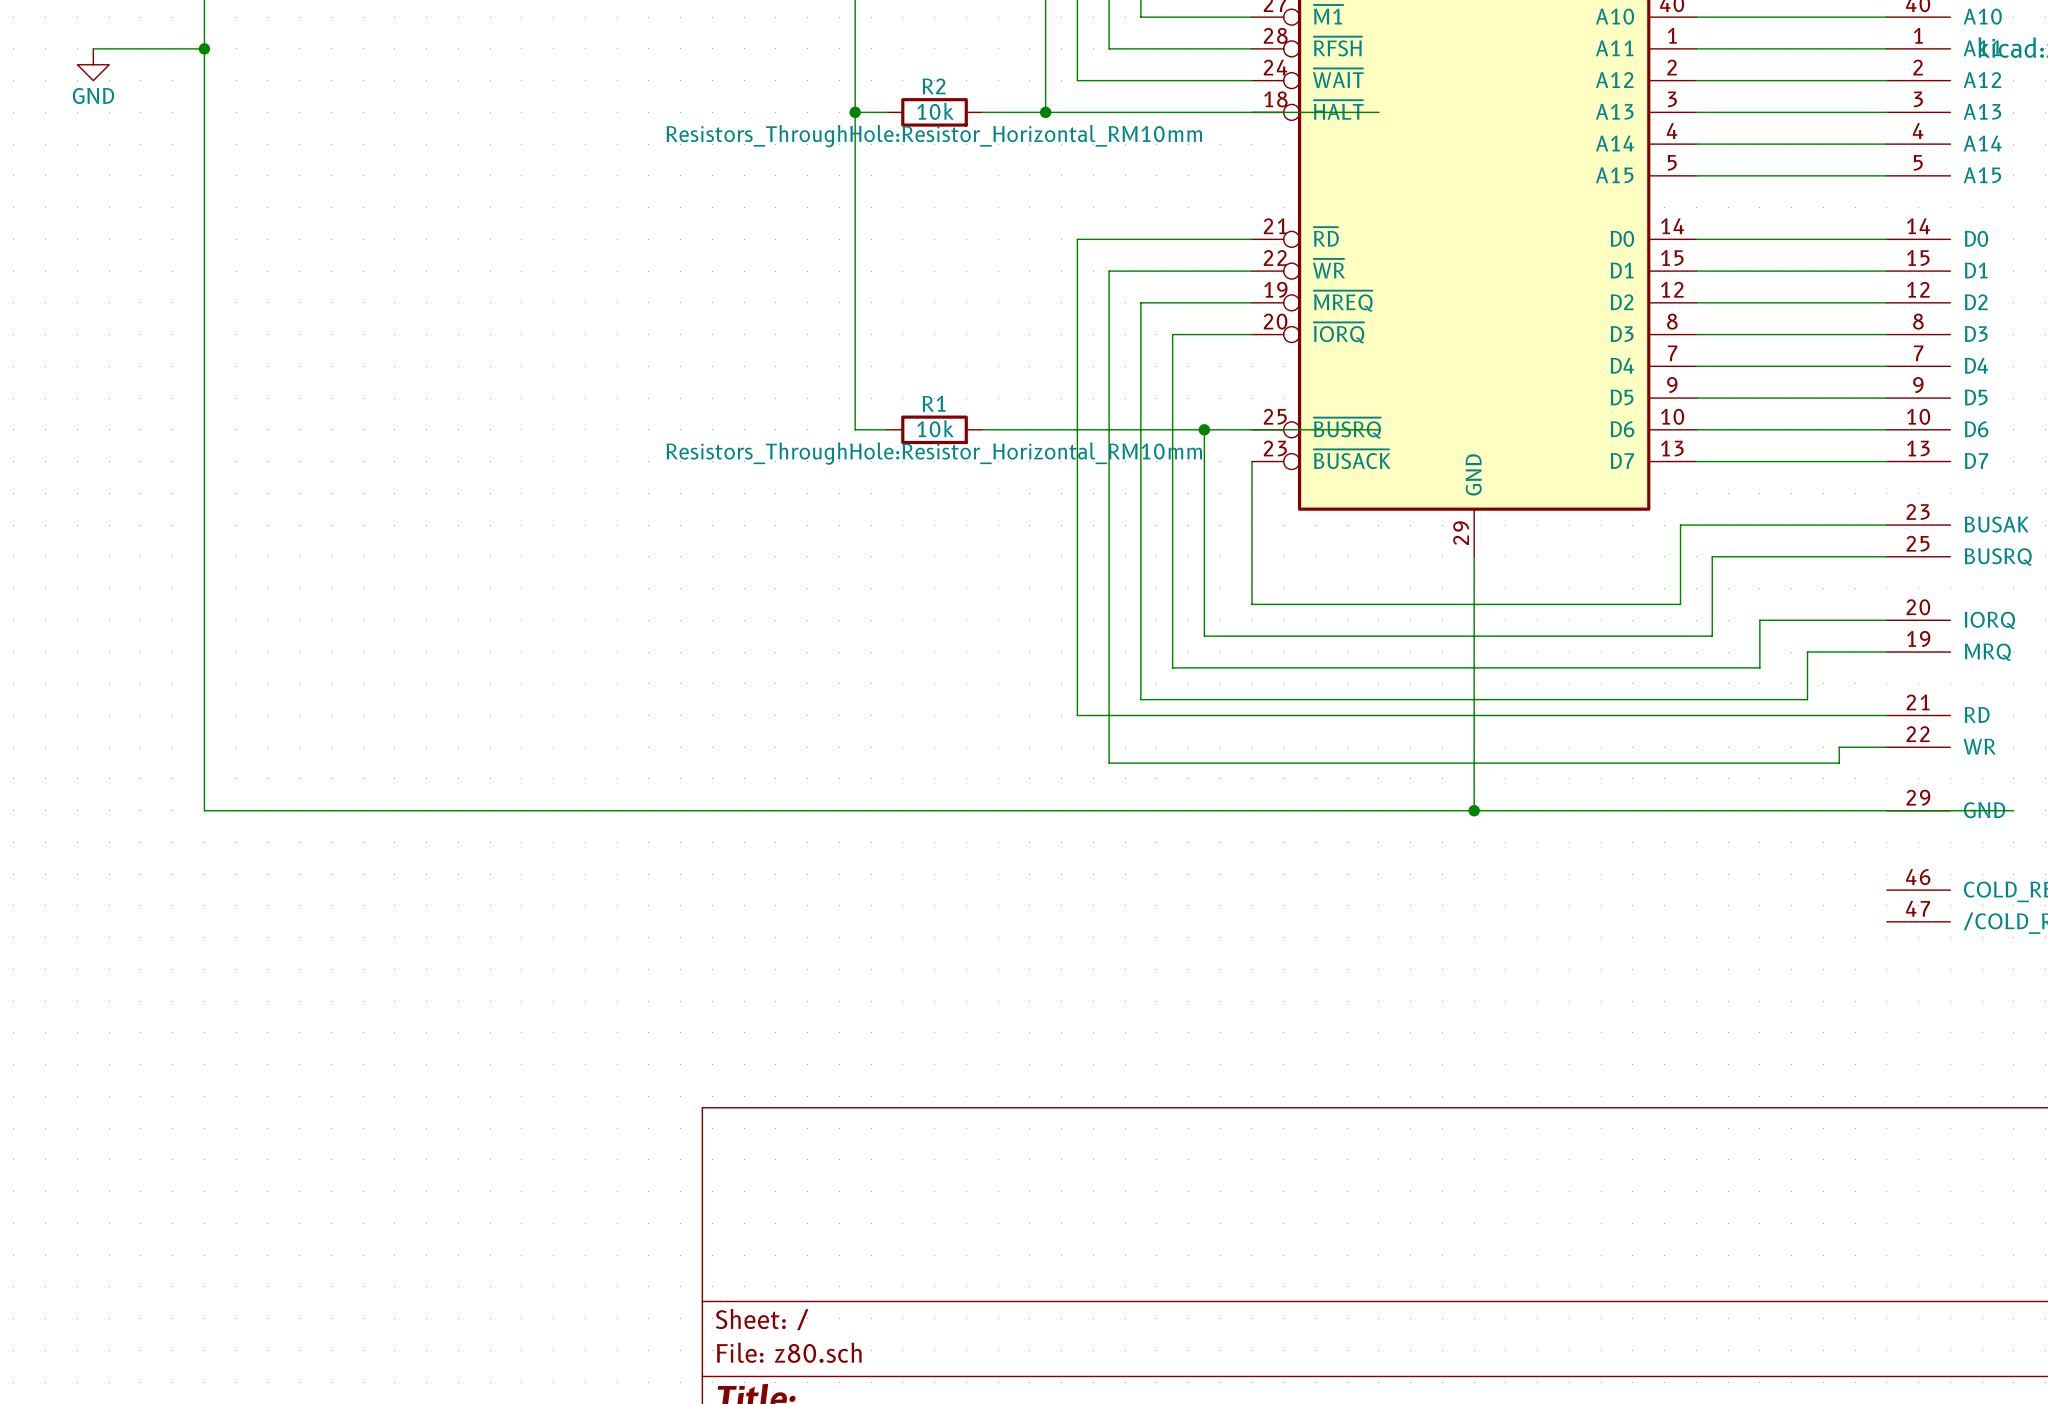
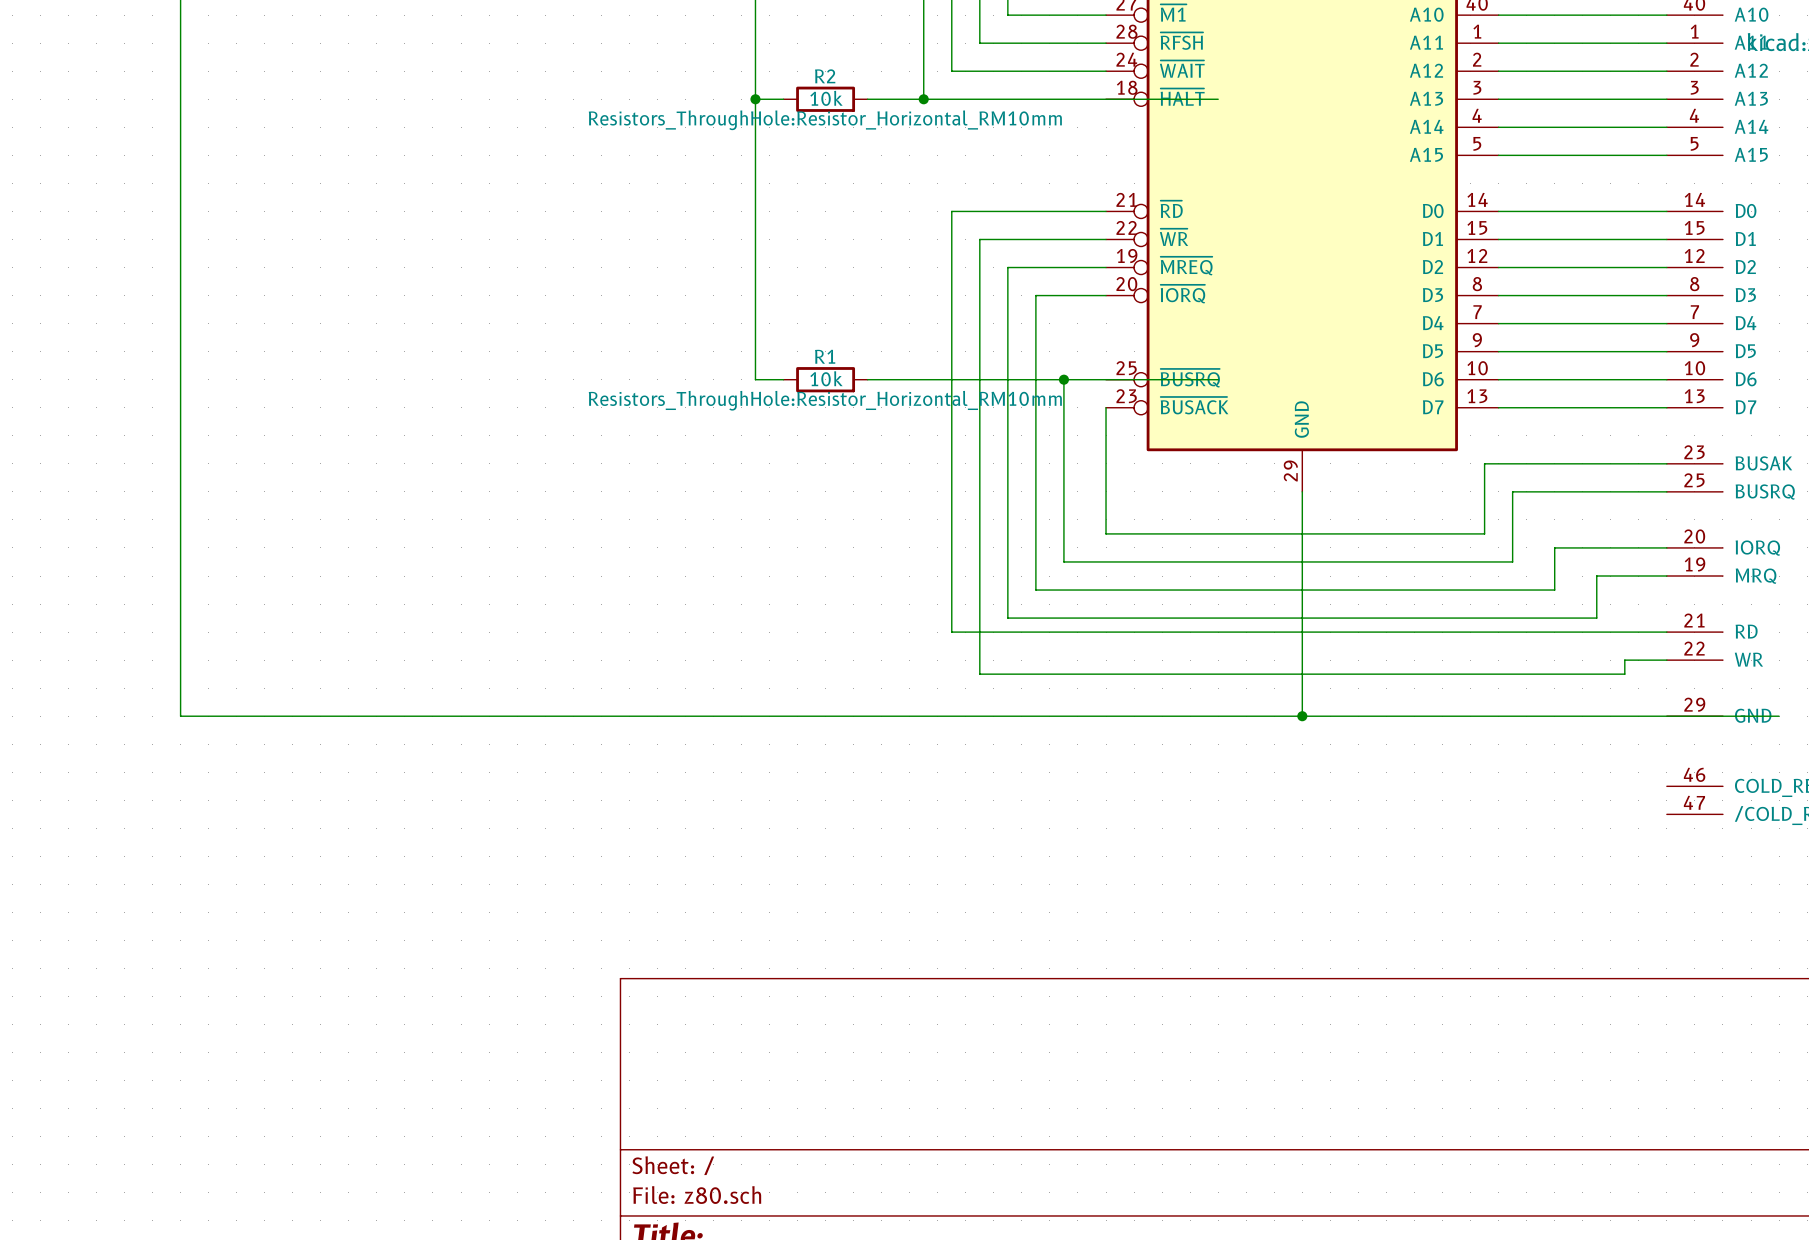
wire: (93, 48) (204, 48) -> none
junction: (204, 48) -> none
power symbol: GND (93, 64) -> none

